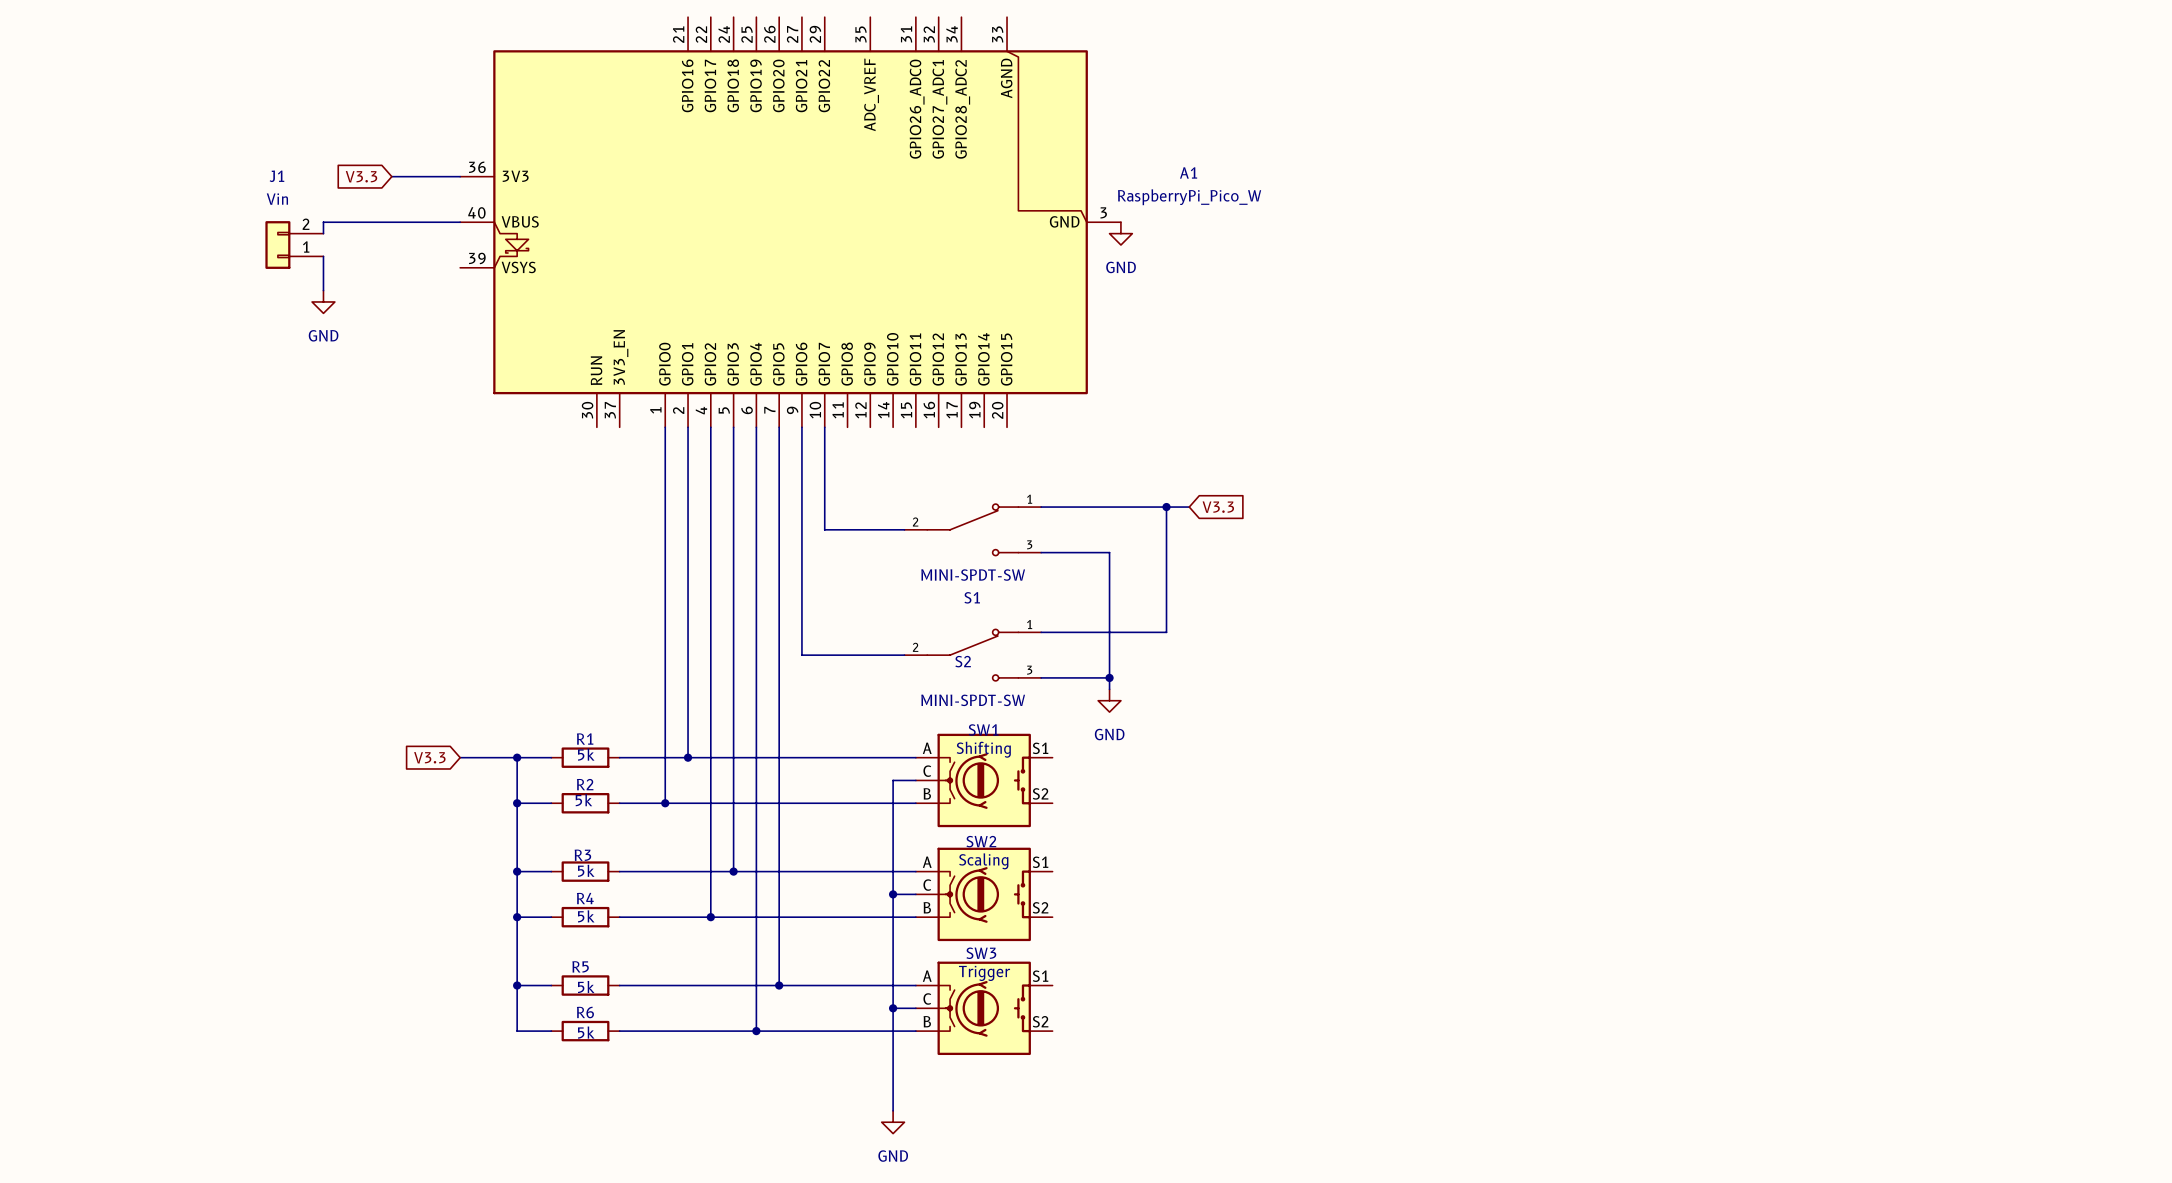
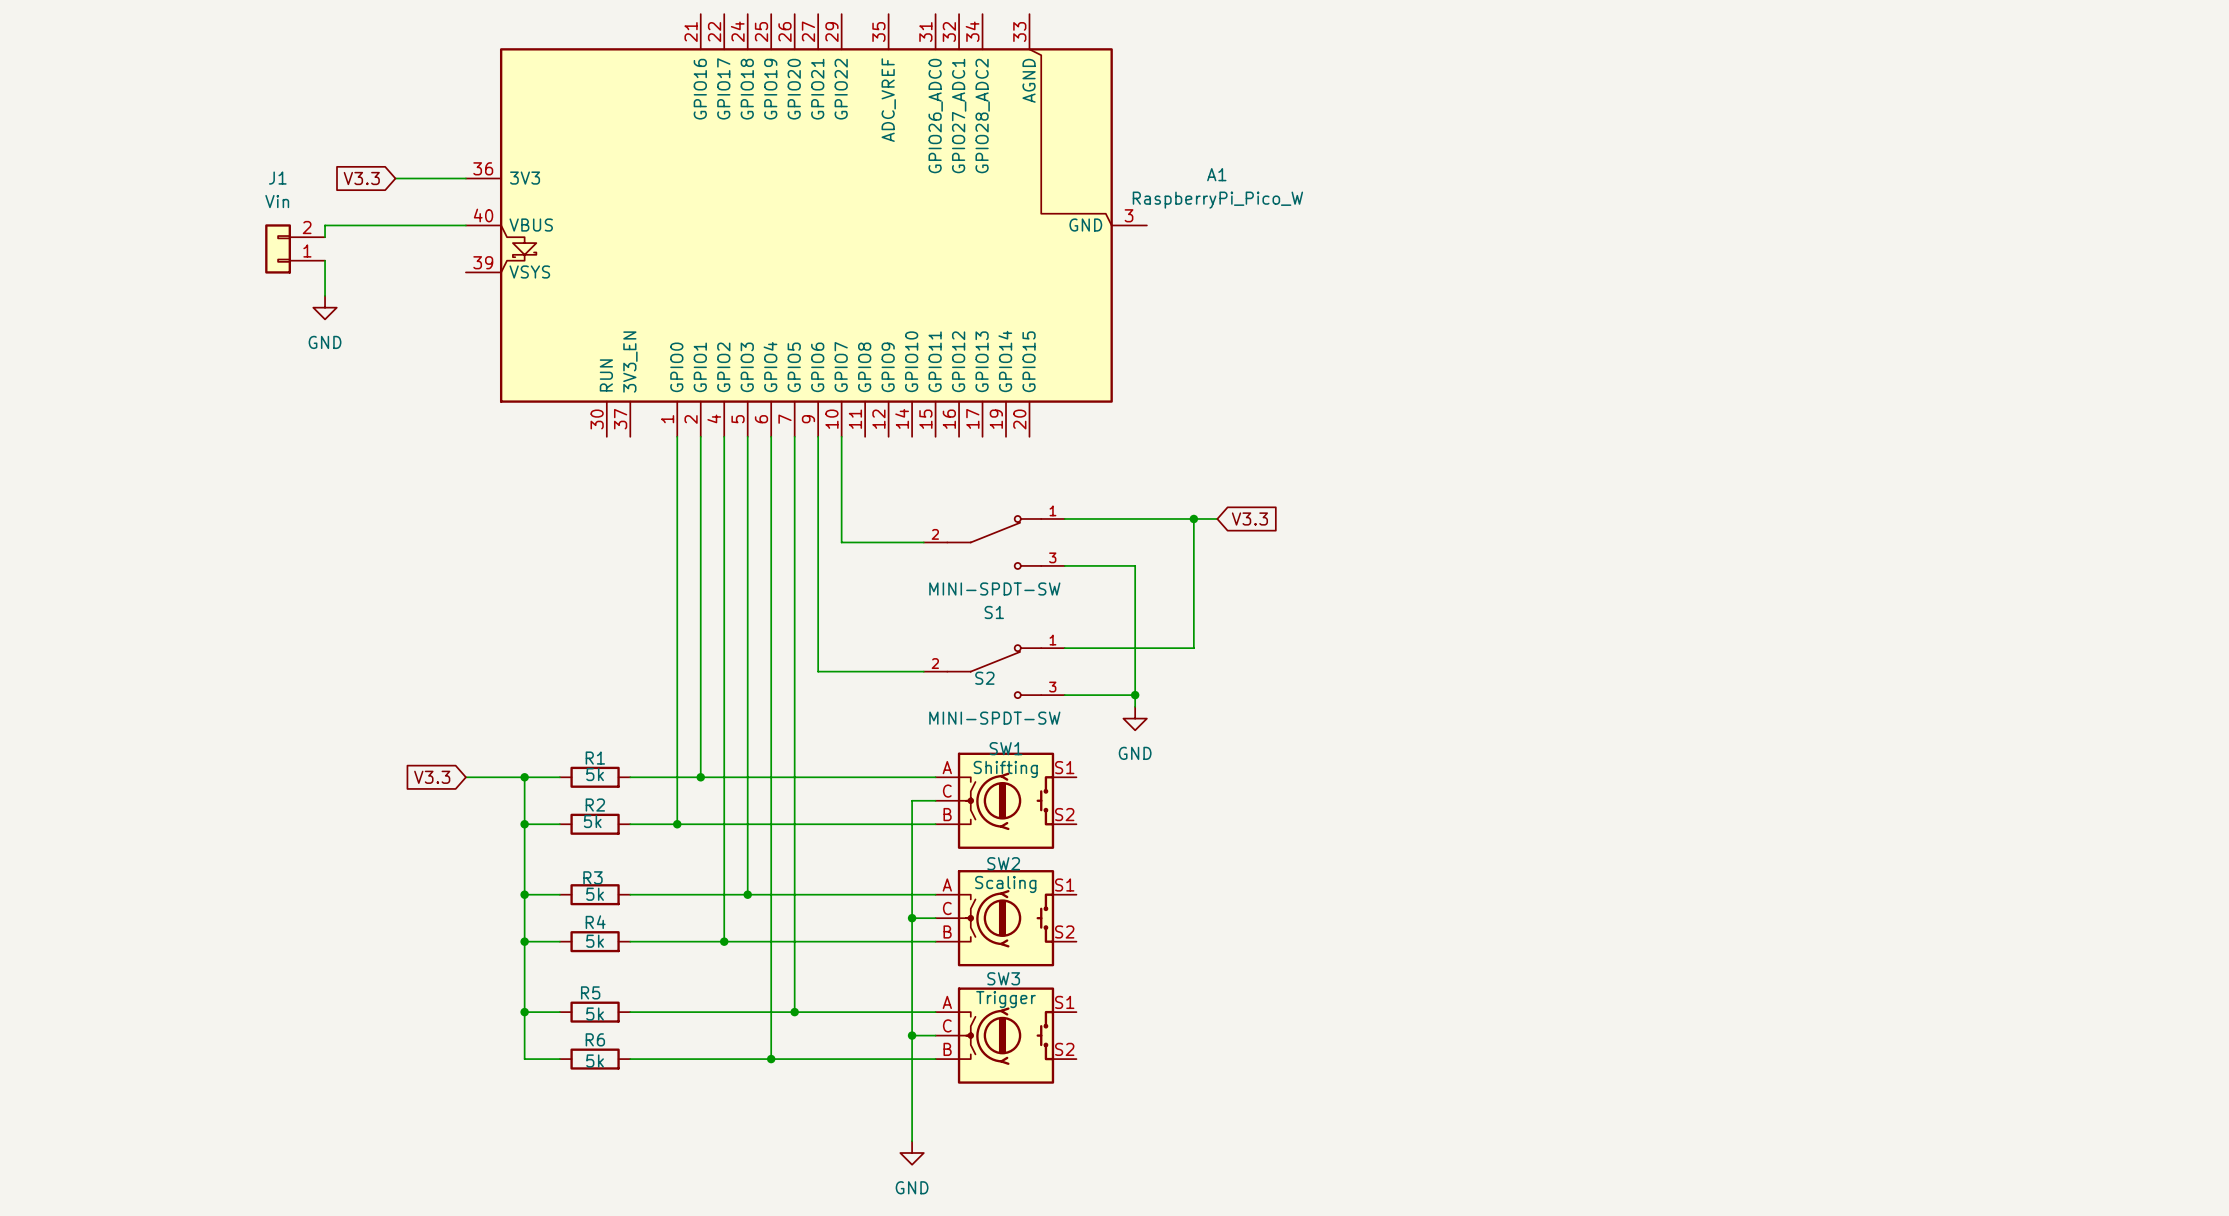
power symbol: GND (1120, 233) -> none

